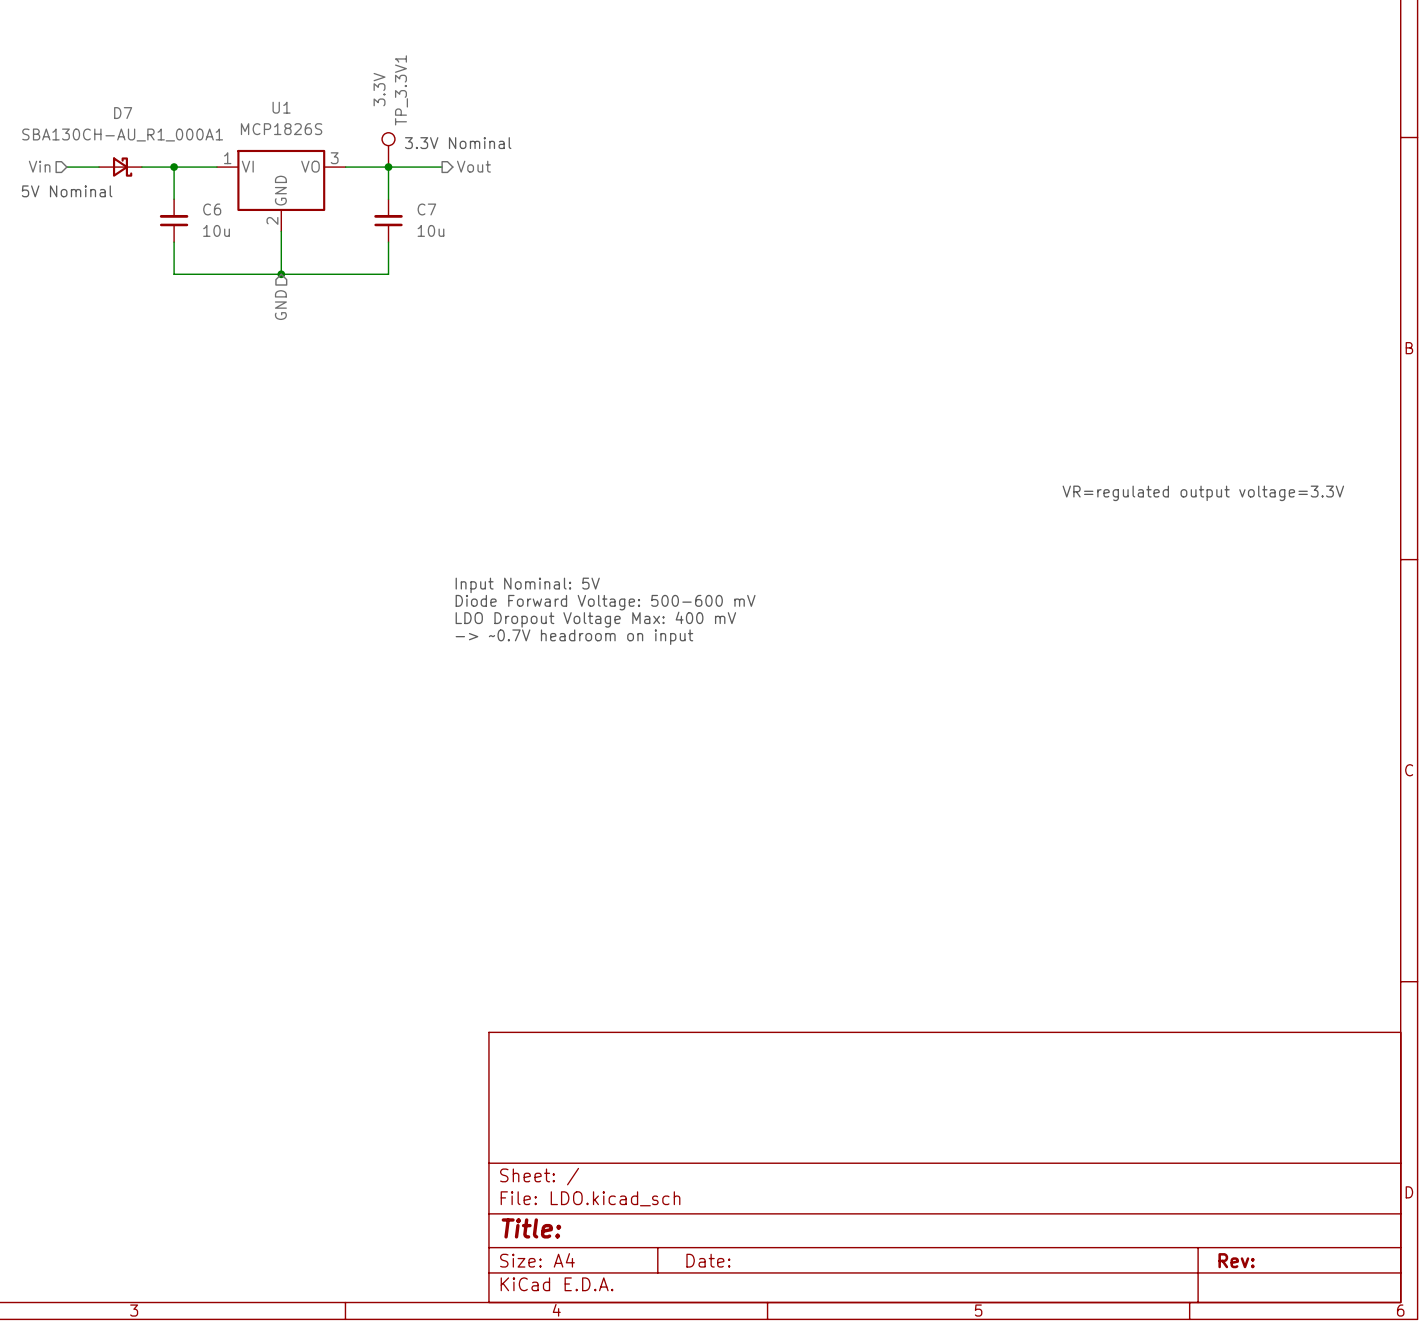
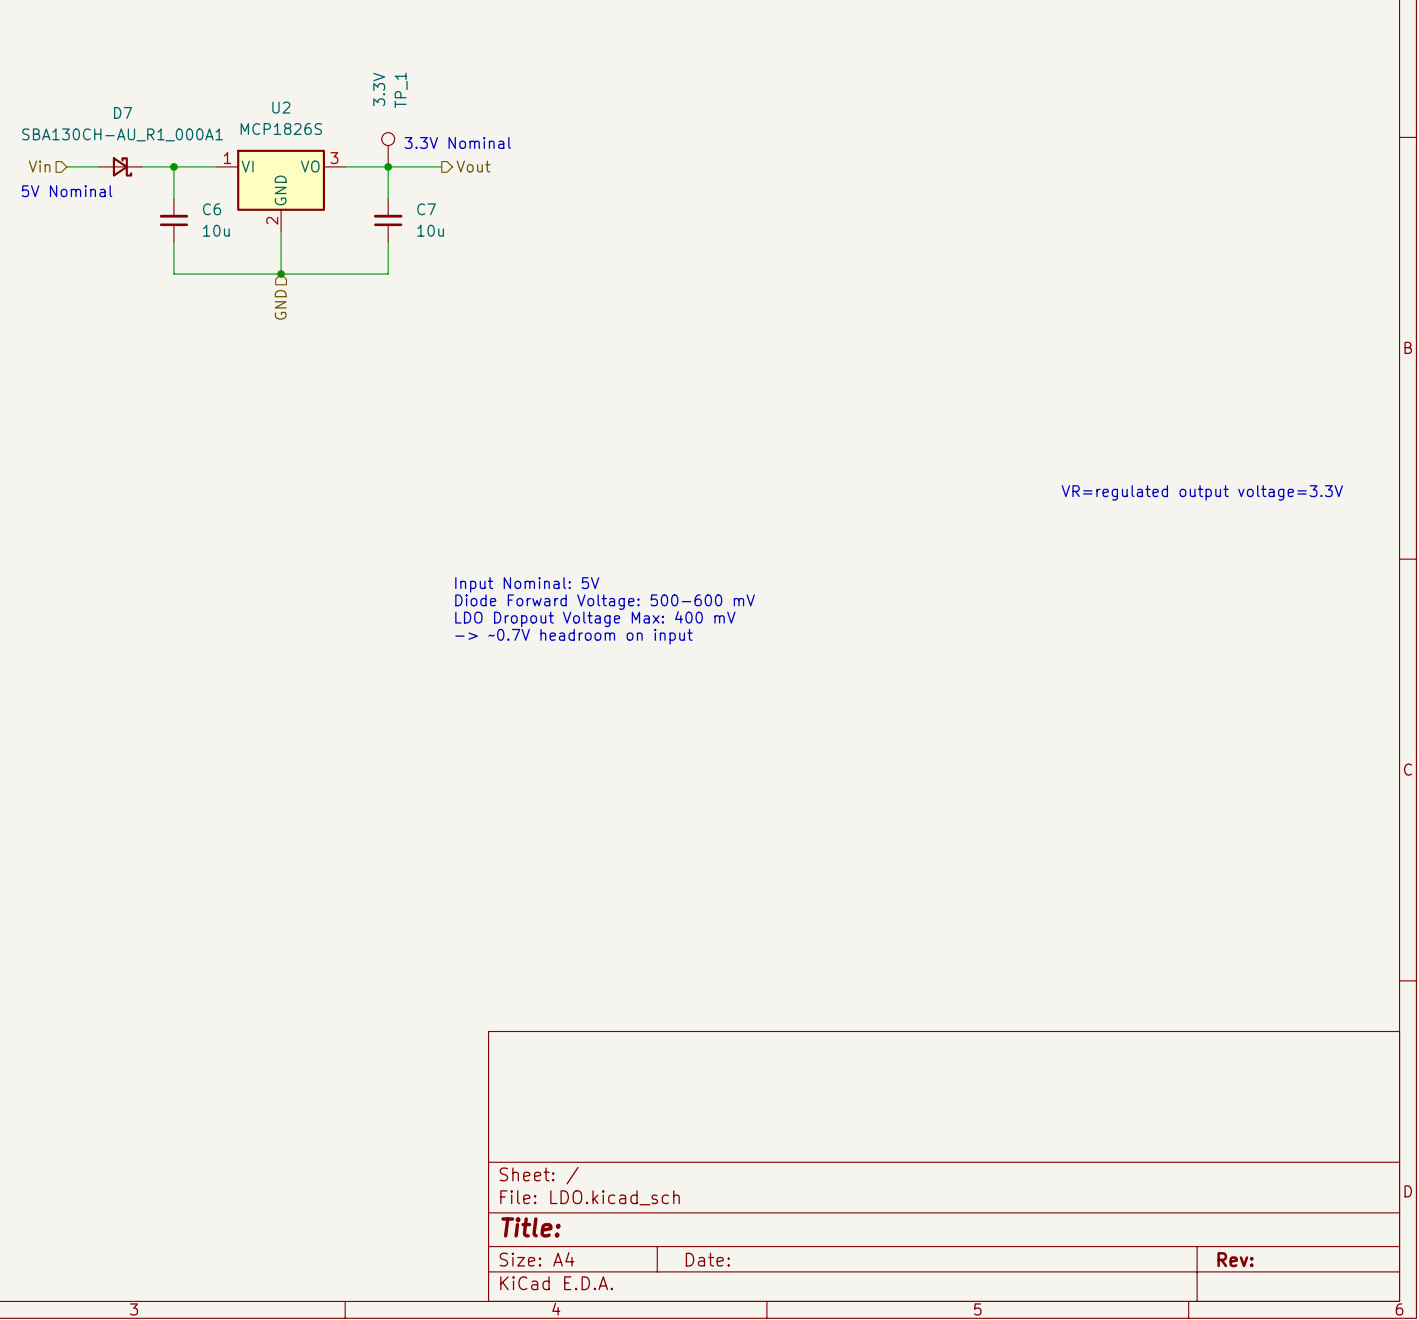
TP_3.3V1 name: TP_3.3V1 (401, 90) -> TP_1 (401, 90)
U1 name: U1 (281, 107) -> U2 (281, 107)

